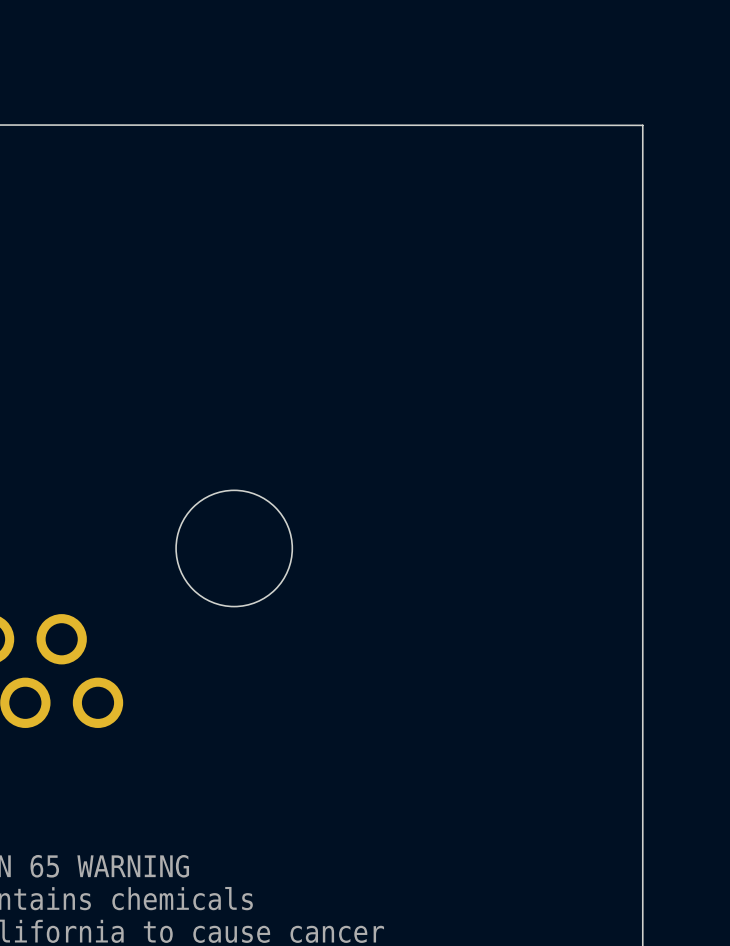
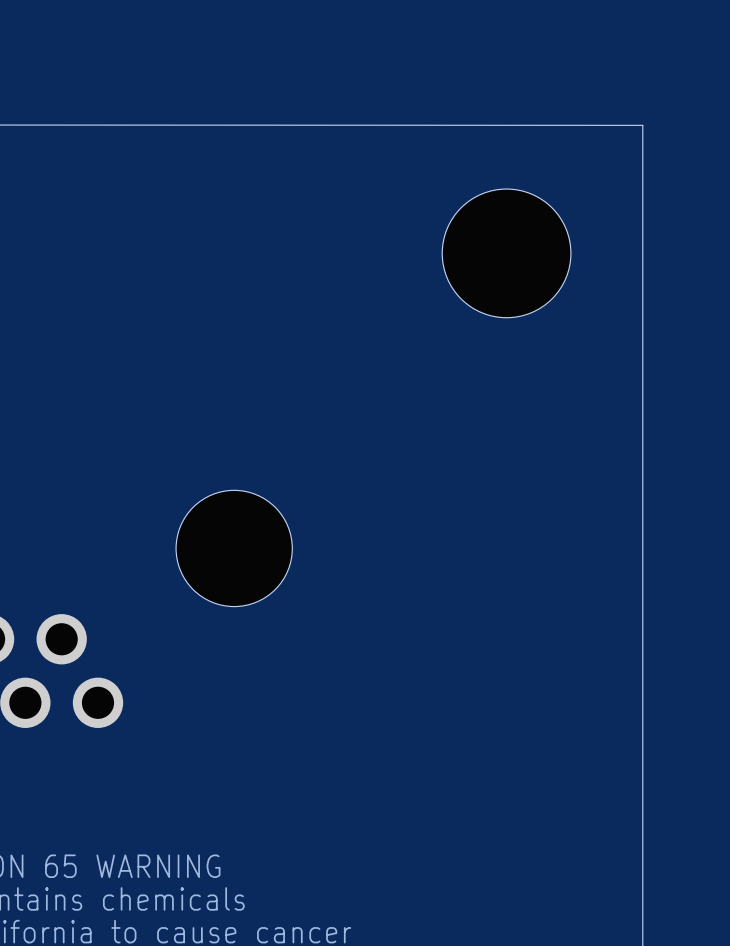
part: none -> (506, 253)

